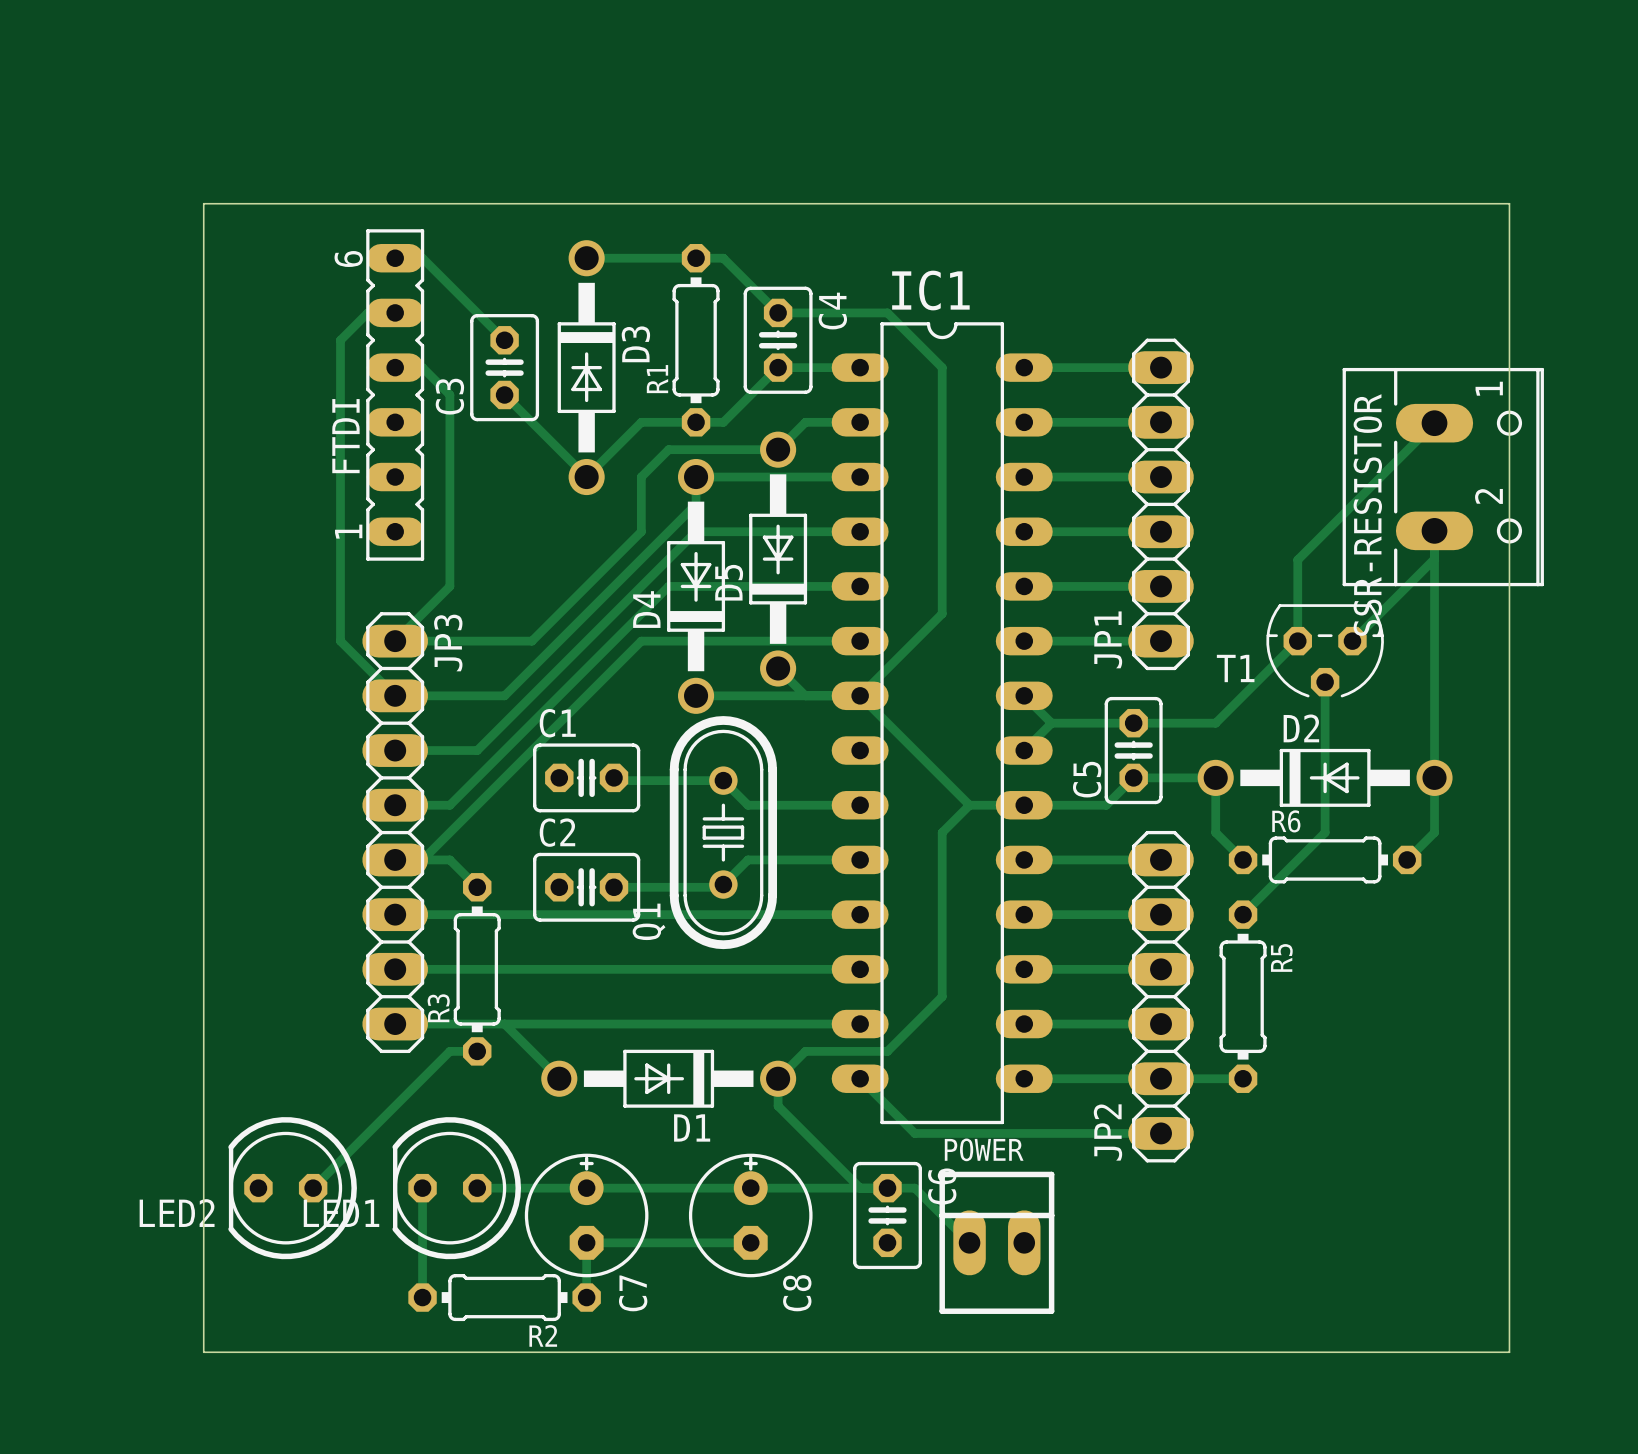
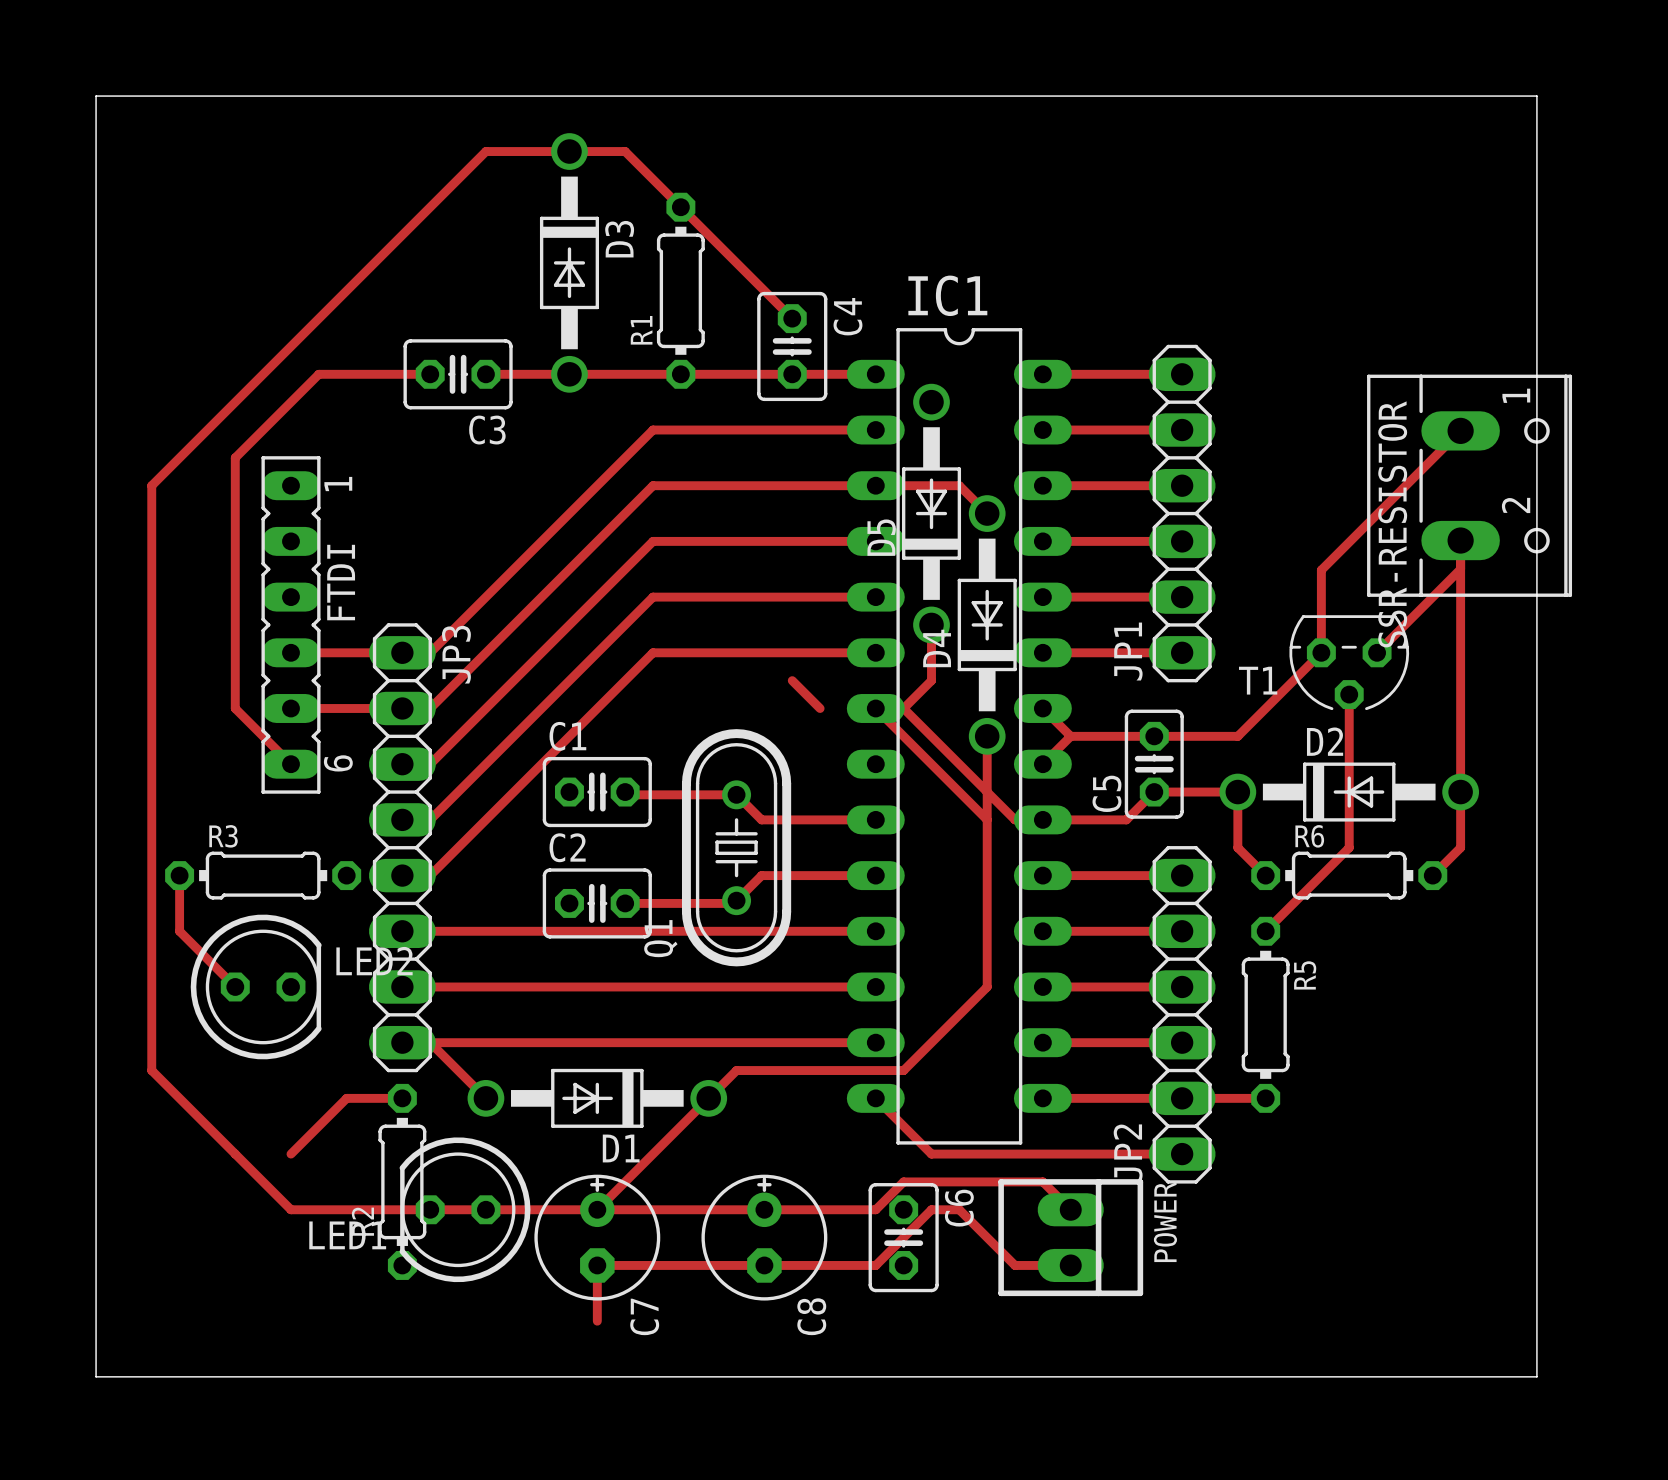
board edge: (1509, 203) (203, 203) (203, 1352) -> (1536, 207) (1536, 96) (96, 96) (96, 1376) (207, 1376)
track: (395, 258) (422, 258) (504, 340) -> none
track: (586, 258) (723, 258) -> (485, 1209) (290, 1209) (151, 1070) (151, 485) (485, 151) (625, 151) (736, 262)
track: (395, 312) (367, 312) (340, 340) (340, 641) (395, 695) -> (290, 708) (402, 708)
track: (778, 312) (887, 312) (942, 367) (942, 613) (860, 695) (696, 695) -> none
R1 position: (696, 340) -> (680, 290)
track: none -> (402, 374) (318, 374) (235, 457) (235, 708) (290, 764)
track: (422, 367) (449, 394) (449, 586) (395, 641) -> (290, 652) (402, 652)
track: none -> (485, 374) (792, 374)
C3 rotation: 0° (504, 367) -> 90° clockwise (458, 374)
D3 position: (586, 367) -> (569, 262)
track: (778, 367) (723, 422) -> (820, 430) (736, 430)
FTDI: (395, 394) -> none
track: (504, 394) (586, 477) -> (430, 652) (597, 485)
C3 name position: C3 (449, 396) -> C3 (487, 430)
track: (805, 422) (778, 449) (668, 449) (641, 477) (641, 531) -> none
track: (696, 477) (696, 504) (504, 695) (422, 695) -> (708, 485) (653, 485) (430, 708)
track: none -> (875, 485) (959, 485) (987, 513)
track: (696, 531) (641, 586) -> (708, 541) (653, 541)
D5 position: (778, 559) -> (931, 513)
track: (668, 586) (449, 805) (422, 805) -> (680, 597) (653, 597)
D4 position: (696, 586) -> (987, 624)
FTDI: none -> (290, 624)
track: none -> (931, 624) (931, 680) (903, 708) (1015, 819)
track: (422, 641) (531, 641) -> (430, 764) (541, 652)
track: (422, 750) (477, 750) -> (430, 819) (485, 764)
track: (996, 805) (969, 805) (942, 832) (942, 996) -> (987, 736) (987, 986) (959, 1014)
track: none -> (179, 875) (179, 931) (235, 986)
track: (422, 859) (449, 859) (477, 887) -> none
R3 rotation: 0° (477, 969) -> 90° clockwise (263, 875)
R3 position: (477, 969) -> (263, 875)
track: (504, 1024) (559, 1078) -> (430, 1042) (485, 1098)
track: (477, 1051) (449, 1051) (313, 1188) -> none
track: (805, 1051) (778, 1078) (778, 1106) (860, 1188) (914, 1188) (969, 1242) -> (820, 1070) (736, 1070) (597, 1209)
track: none -> (402, 1098) (346, 1098) (290, 1154)
D1 position: (668, 1078) -> (597, 1098)
LED2 rotation: 0° (292, 1188) -> 180° (256, 986)
LED2 position: (292, 1188) -> (256, 986)
track: (422, 1188) (422, 1297) -> none
track: none -> (875, 1209) (903, 1181) (1042, 1181) (1070, 1209)
track: none -> (764, 1265) (875, 1265) (931, 1209) (959, 1209) (1015, 1265) (1070, 1265)
POWER rotation: 0° (996, 1242) -> 90° clockwise (1070, 1237)
R2 rotation: 0° (504, 1297) -> 90° clockwise (402, 1181)
R2 position: (504, 1297) -> (402, 1181)

